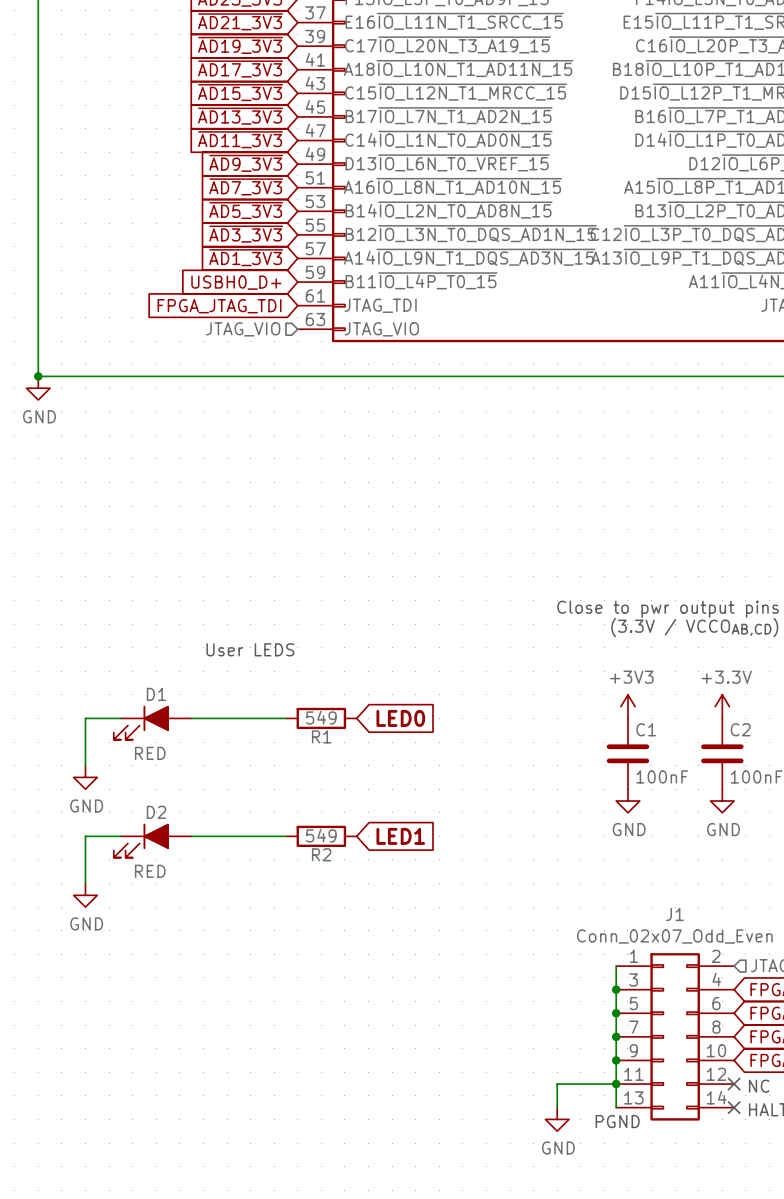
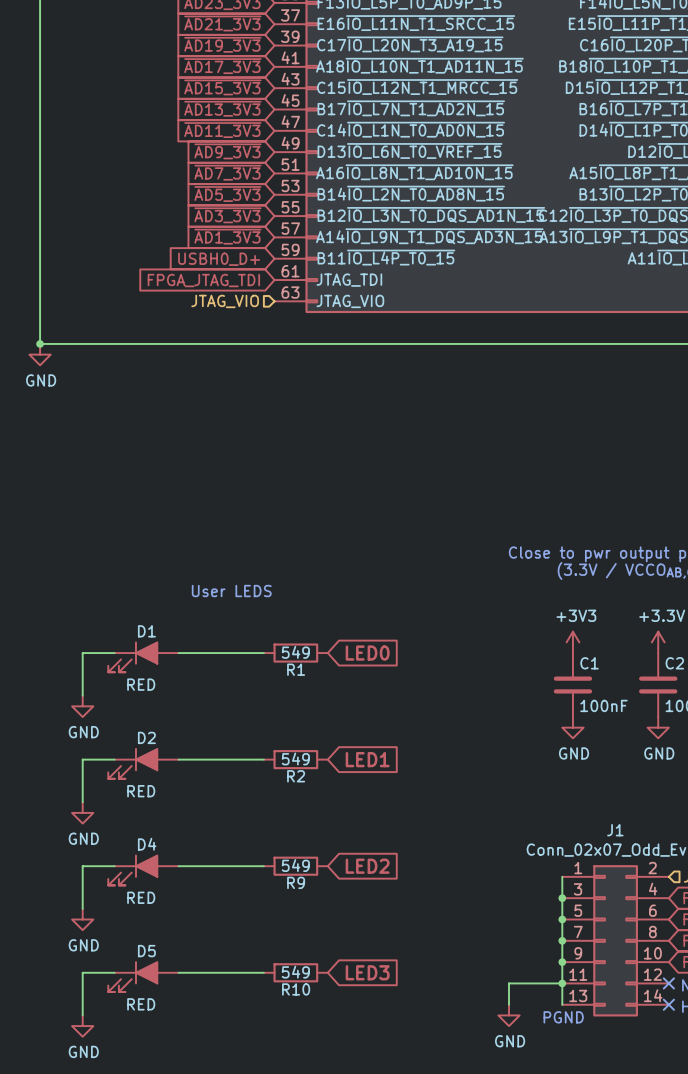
wire: none -> (114, 866) (82, 866) (82, 908)
wire: none -> (178, 866) (263, 866)
R9: none -> 549 (295, 866)
global label: none -> LED2 (367, 866)
D4: none -> RED (143, 870)
power symbol: none -> GND (82, 919)
wire: none -> (114, 972) (82, 972) (82, 1015)
wire: none -> (178, 972) (263, 972)
R10: none -> 549 (295, 972)
global label: none -> LED3 (367, 972)
D5: none -> RED (143, 976)
power symbol: none -> GND (82, 1026)

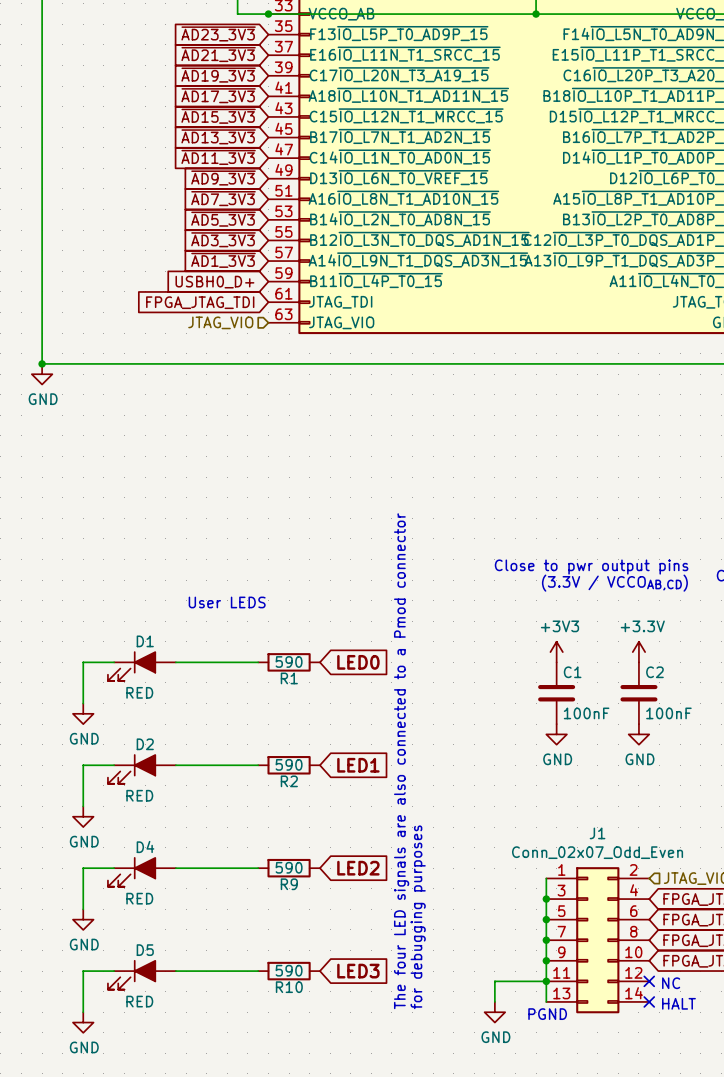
R1 value: 549 (295, 652) -> 590 (289, 661)
text: none -> The four LED signals are also connected to a Pmod connector (401, 761)
R2 value: 549 (295, 758) -> 590 (289, 764)
R9 value: 549 (295, 865) -> 590 (289, 867)
text: none -> for debugging purposes (418, 917)
R10 value: 549 (295, 972) -> 590 (289, 970)

